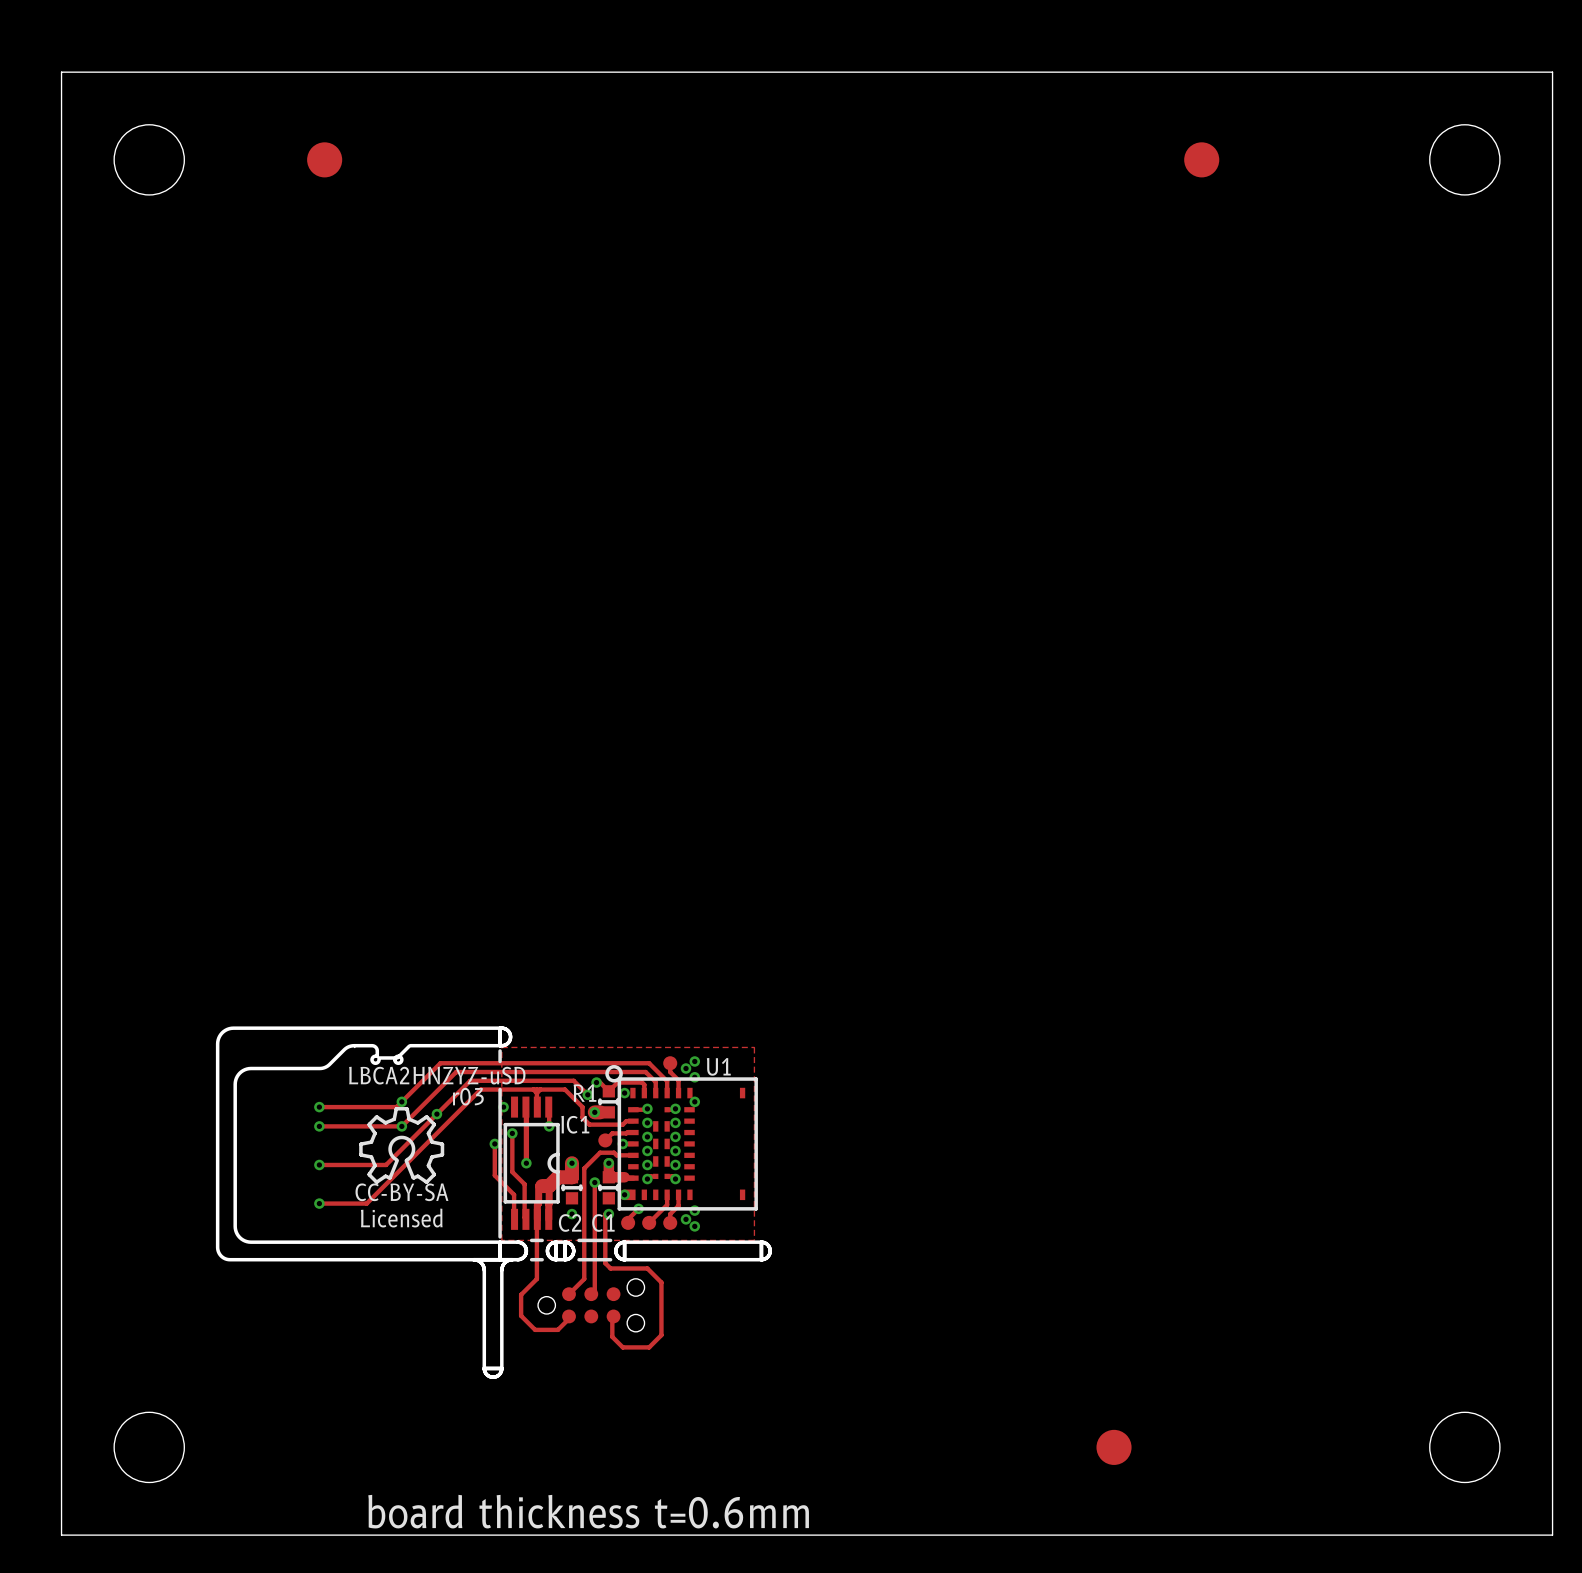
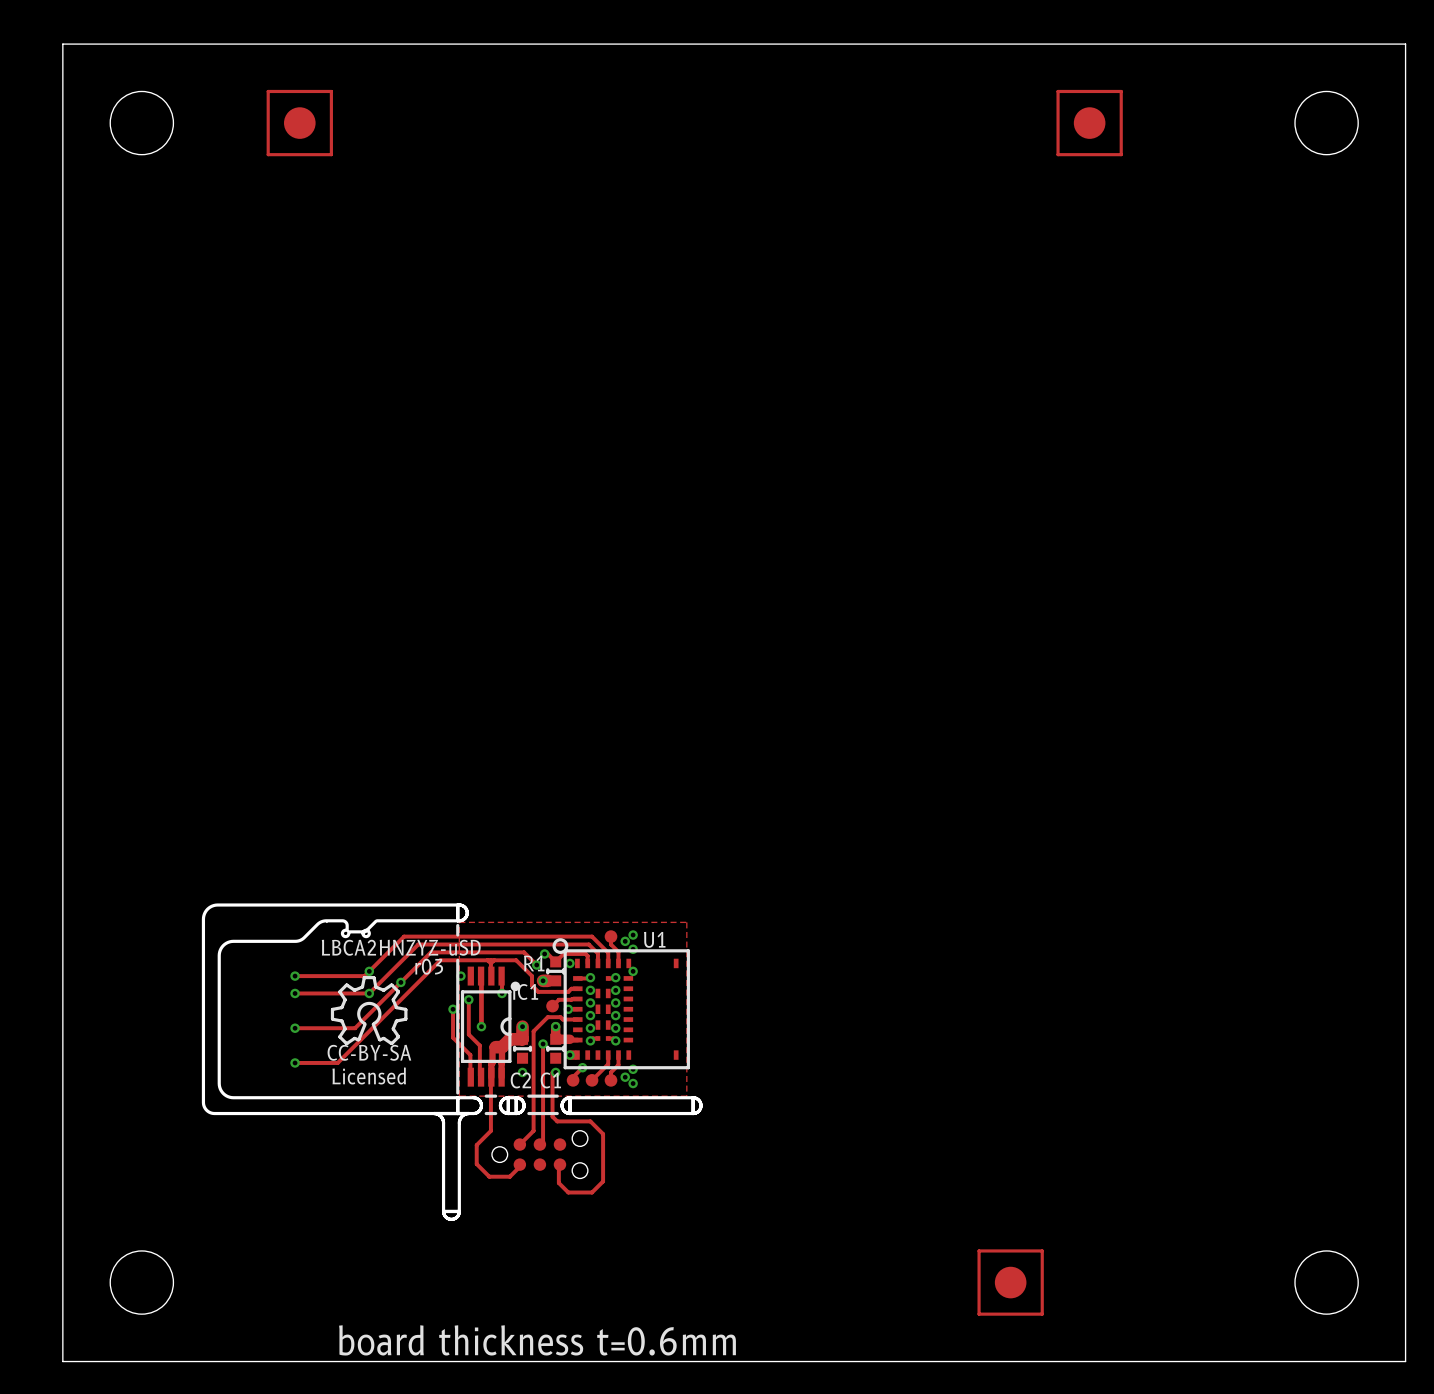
part footprint: [307, 142, 343, 178] -> [266, 89, 333, 157]
part footprint: [1184, 142, 1220, 178] -> [1056, 89, 1123, 157]
IC1 footprint: [503, 1096, 560, 1230] -> [460, 966, 521, 1087]
part footprint: [1096, 1429, 1132, 1465] -> [977, 1249, 1044, 1316]

